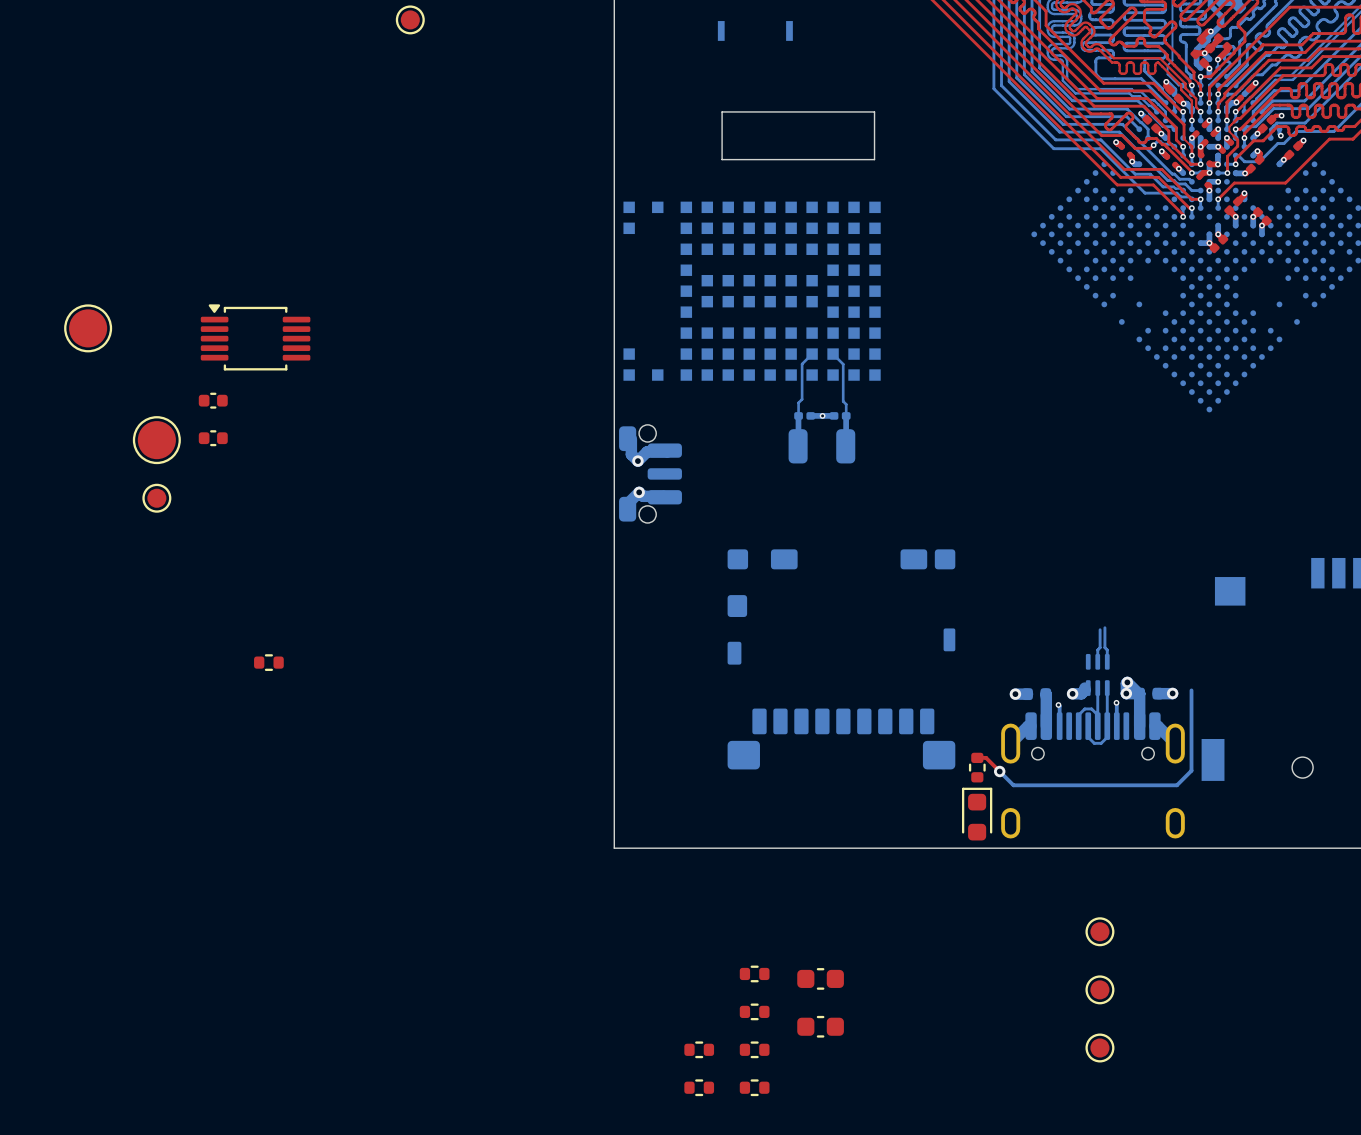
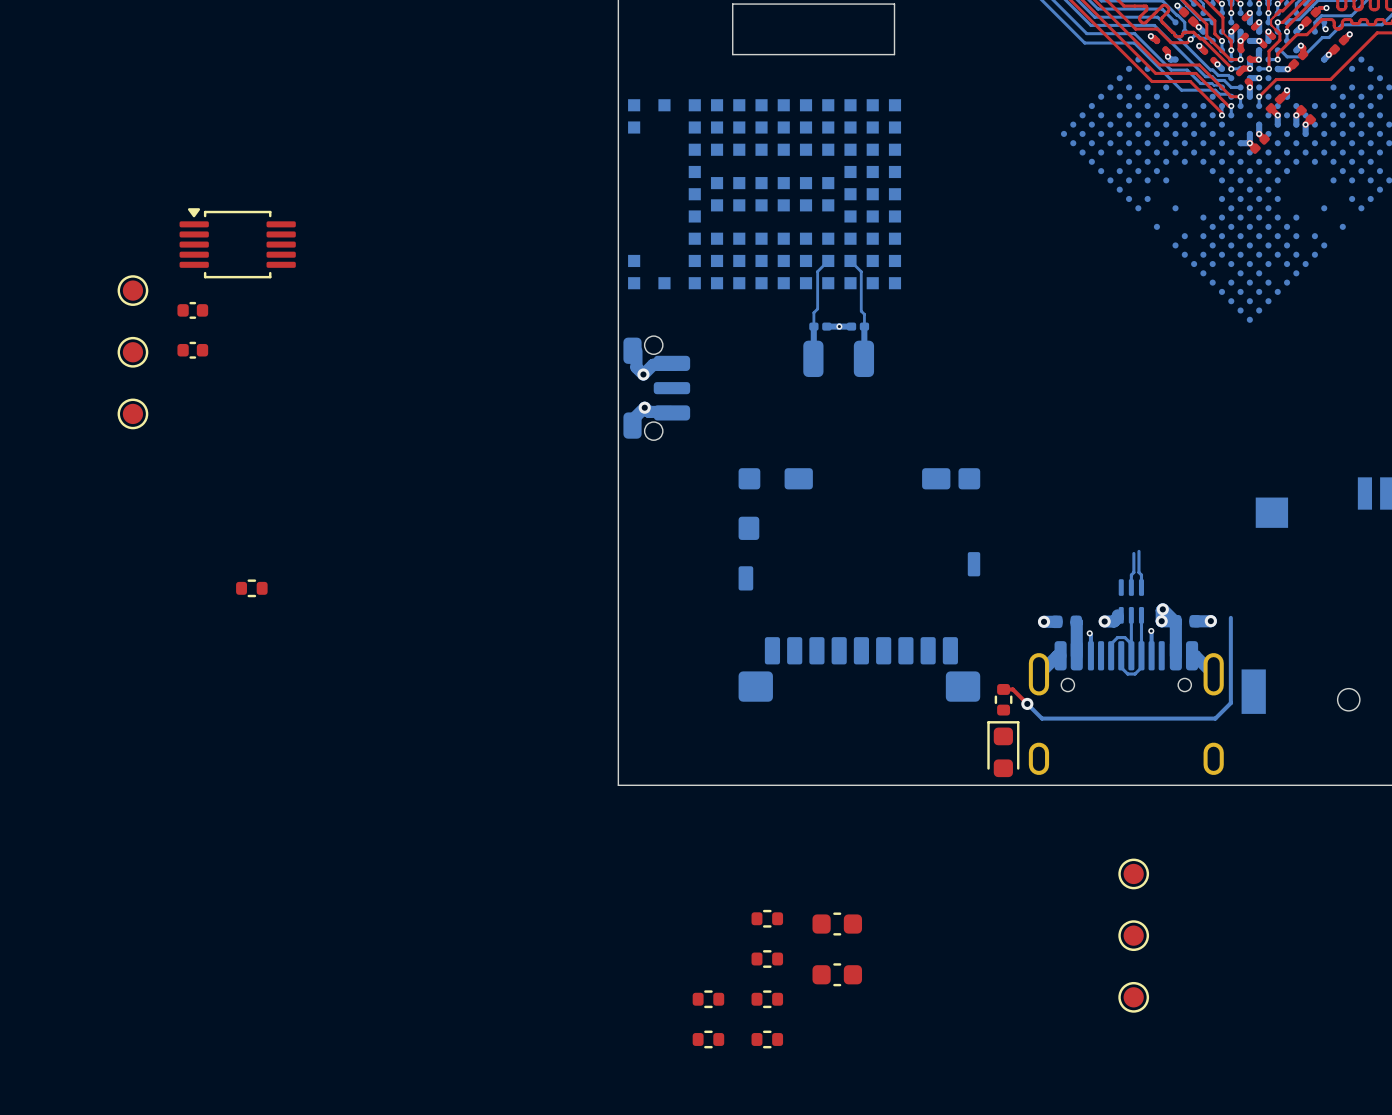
part: (88, 328) -> none
part: none -> (132, 290)
part footprint: [132, 416, 181, 465] -> [117, 336, 149, 368]

